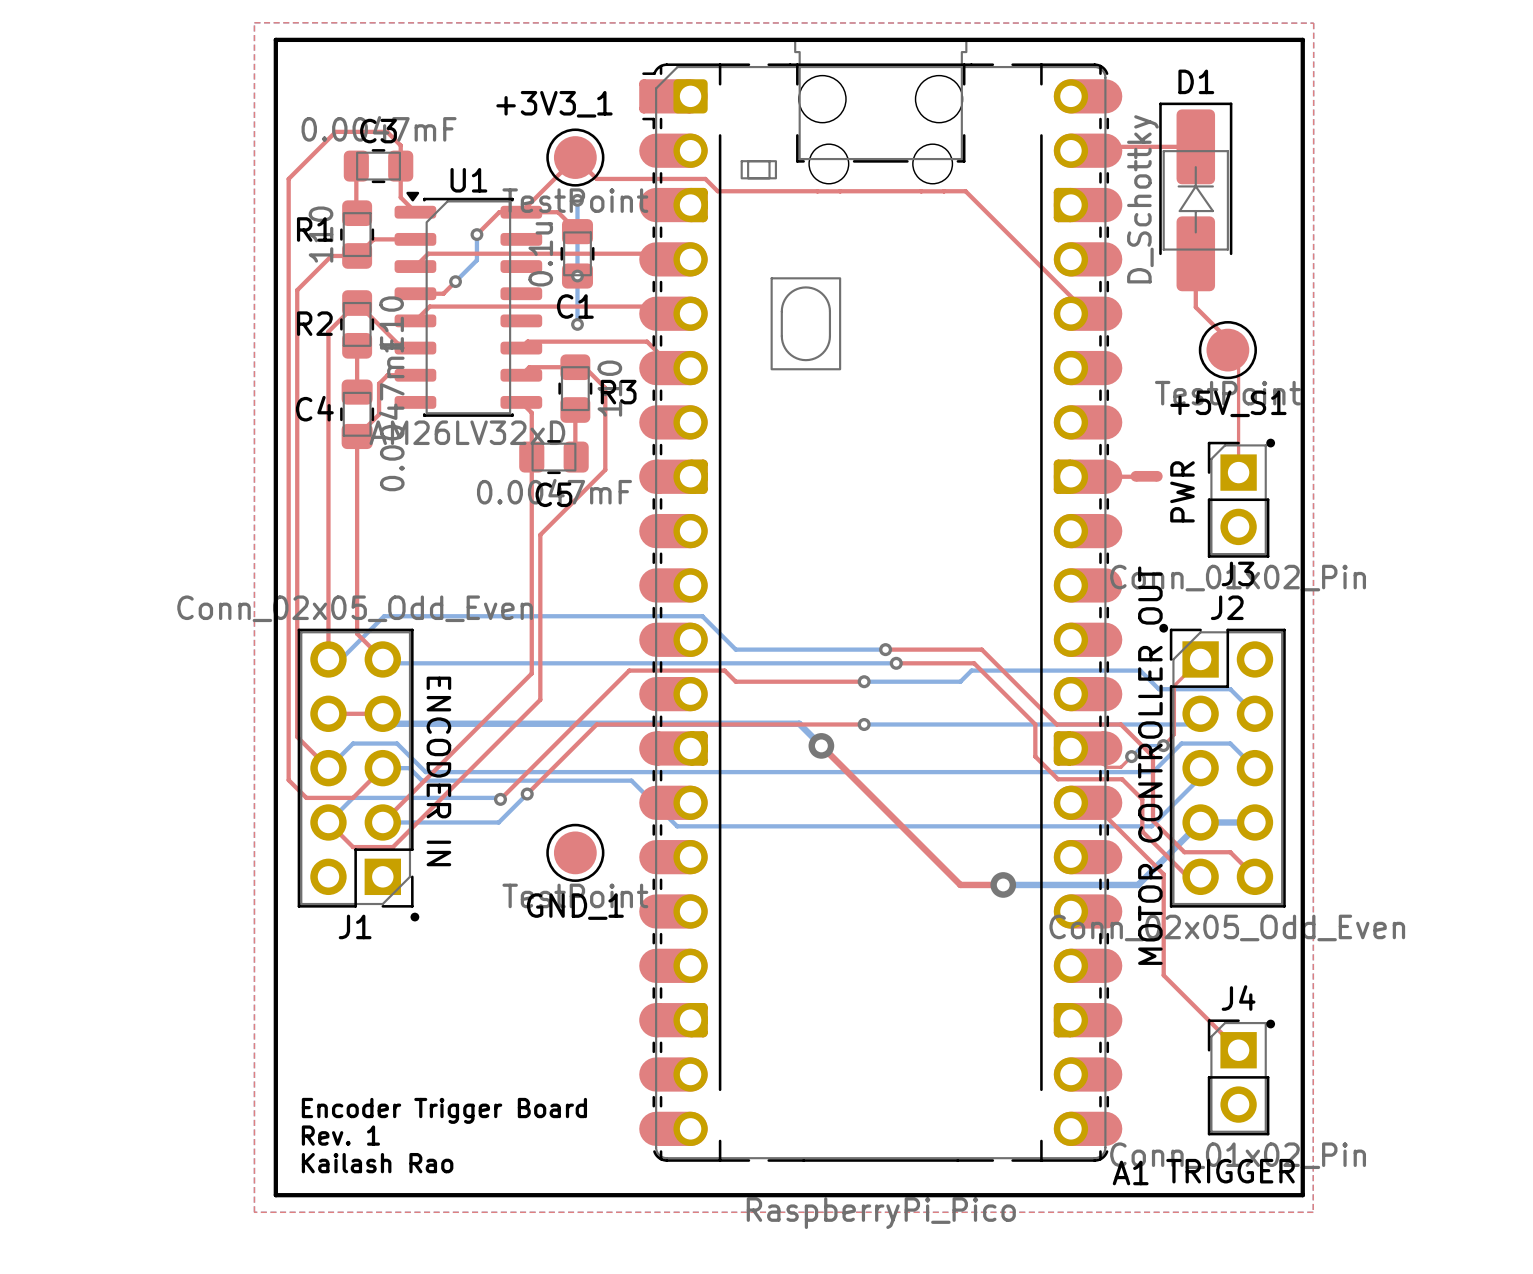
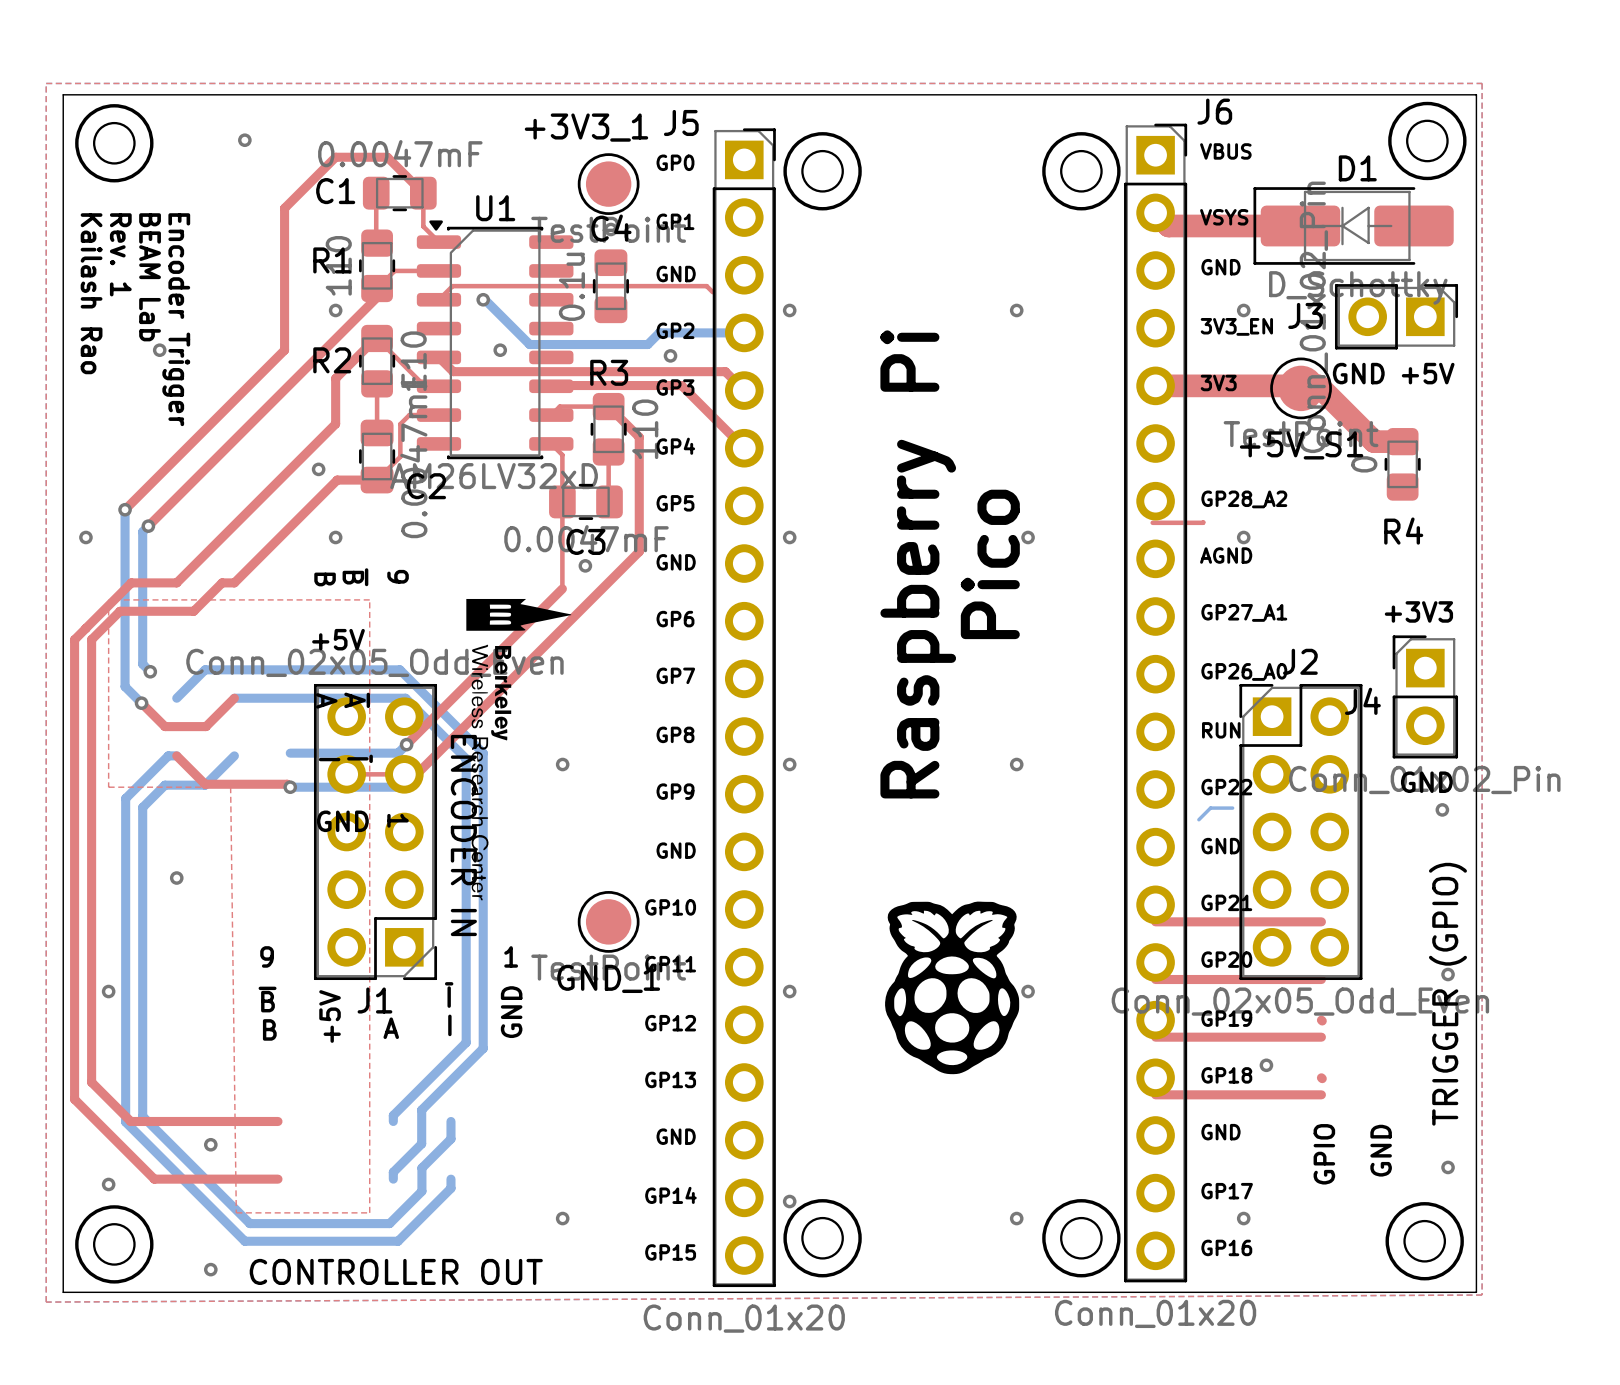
top zone outline: (254, 22) (1313, 23) (1313, 1212) (254, 1212) (254, 22) -> (46, 83) (46, 1302) (1482, 1295) (1482, 83) (46, 83)
board edge: (275, 39) (1302, 39) (1302, 1195) (275, 1195) (275, 39) -> (63, 94) (63, 1292) (1476, 1292) (1476, 94) (63, 94)
drawing: none -> [1388, 101, 1467, 181]
D1 name position: D1 (1196, 81) -> D1 (1357, 168)
drawing: none -> [75, 104, 154, 183]
round board edge: none -> [1406, 119, 1449, 163]
round board edge: none -> [93, 121, 136, 165]
drawing: none -> [783, 132, 862, 211]
drawing: none -> [1042, 132, 1121, 211]
via: none -> (244, 140)
round board edge: none -> [801, 149, 844, 193]
round board edge: none -> [1060, 149, 1103, 193]
text: none -> VBUS (1225, 151)
C3 name: C3 (378, 131) -> C1 (335, 191)
text: none -> GP0 (675, 162)
top track: (1195, 146) (1091, 146) (1088, 150) -> none
top track: (575, 157) (596, 178) (705, 178) (717, 191) (965, 191) (1088, 313) -> none
top track: (400, 166) (400, 145) (387, 131) (335, 131) (288, 178) (288, 780) (306, 797) (353, 797) (382, 768) -> (423, 193) (387, 157) (335, 157) (284, 208) (284, 350) (125, 509)
top track: (562, 170) (521, 212) (558, 212) (577, 231) -> none
top track: none -> (1155, 212) (1168, 225) (1300, 225)
text: none -> VSYS (1224, 217)
text: none -> GP1 (675, 221)
D1 rotation: 0° (1195, 196) -> 90° counterclockwise (1353, 225)
bottom track: (577, 200) (577, 324) -> none
top track: (511, 212) (499, 212) (476, 234) -> none
text: none -> Rev. 1 (120, 254)
bottom track: (476, 234) (476, 260) (455, 281) -> none
via: (476, 234) -> none
text: none -> GND (1220, 267)
text: none -> GND (676, 274)
text: none -> BEAM Lab (150, 277)
top track: (1195, 253) (1195, 307) (1227, 339) (1227, 350) (1238, 360) (1238, 472) -> none
top track: (357, 255) (331, 255) (297, 290) (297, 736) (328, 768) -> (377, 288) (377, 297) (148, 526)
text: none -> Kailash Rao (91, 293)
bottom track: none -> (484, 299) (529, 344) (647, 344) (659, 332) (744, 332) (737, 326)
via: none -> (335, 310)
via: (577, 276) -> none
via: none -> (789, 310)
via: none -> (1016, 310)
via: none -> (1243, 310)
top track: (455, 281) (443, 293) (429, 293) -> none
via position: (455, 281) -> (483, 299)
text: none -> Encoder Trigger (176, 319)
text: none -> 3V3_EN (1236, 326)
text: none -> GP2 (675, 330)
top track: (357, 303) (328, 331) (328, 659) -> (377, 338) (335, 378) (335, 423) (176, 582) (131, 582) (74, 639) (74, 1099) (154, 1179) (277, 1179)
C1 name: C1 (575, 306) -> C4 (611, 228)
top track: (673, 313) (666, 306) (429, 306) (415, 320) -> (744, 390) (725, 371) (453, 371) (438, 357)
via: none -> (159, 350)
via: none -> (500, 350)
via: none -> (670, 355)
via: (577, 324) -> none
text: none -> GND (1358, 373)
text: none -> +5V (1428, 373)
text: none -> 3V3 (1218, 383)
top track: (522, 347) (527, 341) (647, 341) (673, 368) -> none
top track: none -> (1155, 385) (1318, 385) (1374, 441) (1402, 441)
top track: none -> (551, 386) (681, 385) (744, 448)
text: none -> GP3 (675, 387)
top track: (584, 367) (605, 387) (605, 469) (540, 534) (540, 699) (393, 847) (353, 847) (328, 822) -> none
top track: none -> (608, 408) (608, 406) (639, 437) (639, 551) (417, 773)
R3 name position: R3 (618, 392) -> R3 (609, 372)
text: none -> GP4 (675, 446)
C4 name: C4 (314, 408) -> C2 (426, 486)
R4: none -> 0 (1402, 464)
via: none -> (318, 469)
top track: none -> (377, 480) (337, 480) (234, 582) (222, 582) (193, 611) (119, 611) (91, 639) (91, 1082) (130, 1121) (277, 1121)
drawing: [1266, 438, 1276, 448] -> none
top track: (361, 440) (357, 436) (357, 633) (382, 659) -> none
text: none -> GP28_A2 (1244, 499)
text: none -> GP5 (675, 503)
bottom track: none -> (125, 509) (125, 686) (141, 703)
via: none -> (125, 509)
part: (1146, 476) -> none
bottom track: none -> (148, 526) (142, 531) (142, 664) (150, 671)
via: none -> (148, 526)
via: none -> (85, 537)
via: none -> (335, 537)
via: none -> (789, 537)
via: none -> (1028, 537)
via: none -> (1243, 537)
text: PWR (1182, 491) -> none
C5 name: C5 (553, 494) -> C3 (585, 541)
J3 rotation: 0° (1238, 499) -> 90° clockwise (1396, 316)
J3 position: (1238, 499) -> (1396, 316)
text: none -> AGND (1226, 555)
text: none -> GND (676, 562)
text: none -> Raspberry Pi (918, 564)
text: none -> Pico (990, 564)
via: none -> (585, 565)
text: none -> 9 (398, 576)
text: none -> ~{B} (355, 577)
text: none -> B (325, 579)
top track: (531, 539) (531, 673) (382, 822) -> (562, 588) (406, 744)
drawing: none -> [466, 598, 572, 901]
top zone outline: none -> (108, 599) (369, 599) (369, 1212) (236, 1212) (230, 787) (108, 787) (108, 599)
text: none -> +3V3 (1418, 611)
text: none -> GP27_A1 (1244, 612)
text: none -> GP6 (675, 619)
text: none -> +5V (338, 639)
A1: RaspberryPi_Pico (880, 599) -> none
via: none -> (150, 671)
text: none -> GP26_A0 (1244, 671)
text: none -> GP7 (675, 675)
drawing: [1159, 623, 1169, 633] -> none
bottom track: none -> (176, 698) (205, 669) (399, 669) (483, 753) (483, 1048) (421, 1110) (421, 1143) (393, 1172) (393, 1179)
top track: none -> (234, 698) (206, 726) (164, 726) (141, 703)
bottom track: none -> (234, 698) (405, 698) (466, 758) (466, 1042) (393, 1115) (393, 1121)
text: none -> A (326, 700)
text: none -> ~{A} (357, 700)
via: none -> (141, 703)
J6: none -> Conn_01x20 (1155, 703)
top track: (885, 649) (981, 649) (1056, 724) (1120, 724) (1153, 756) (1153, 820) (1184, 852) (1230, 852) (1254, 876) -> none
bottom track: (885, 649) (735, 649) (702, 616) (384, 616) (340, 659) (328, 659) -> none
via: (885, 649) -> none
J5: none -> Conn_01x20 (744, 707)
top track: (1200, 659) (1174, 685) (1174, 734) (1163, 745) -> none
bottom track: (386, 663) (896, 663) -> none
top track: (896, 663) (974, 663) (1035, 724) (1035, 756) (1058, 779) (1122, 779) (1142, 799) (1142, 831) (1187, 876) (1200, 876) -> none
via: (896, 663) -> none
text: none -> RUN (1221, 730)
text: none -> GP8 (675, 734)
top track: (864, 681) (735, 681) (724, 670) (629, 670) (500, 799) -> none
bottom track: (864, 681) (960, 681) (971, 670) (1140, 670) (1158, 689) (1230, 689) (1254, 713) -> none
via: (864, 681) -> none
bottom track: none -> (406, 744) (398, 753) (290, 753)
via: none -> (406, 744)
top track: none -> (176, 755) (205, 784) (287, 784) (290, 787)
bottom track: none -> (176, 755) (168, 755) (125, 798) (125, 1122) (244, 1241) (398, 1241) (450, 1188) (450, 1179)
bottom track: none -> (234, 755) (205, 785) (164, 785) (142, 807) (142, 1116) (249, 1223) (389, 1223) (421, 1191) (421, 1168) (450, 1139) (450, 1121)
text: none -> I (329, 759)
text: none -> ~{I} (359, 758)
via: none -> (562, 764)
via: none -> (789, 764)
via: none -> (1016, 764)
bottom track: none -> (417, 773) (403, 787) (290, 787)
bottom track: (382, 713) (393, 724) (799, 723) (821, 745) -> none
bottom track: (1200, 713) (1189, 724) (864, 724) -> none
text: none -> GND (1426, 782)
top track: (864, 724) (596, 724) (527, 794) -> none
via: (864, 724) -> none
via: none -> (290, 787)
text: none -> GP22 (1226, 787)
text: none -> GP9 (675, 791)
top track: (821, 745) (960, 884) (1003, 884) -> none
via: (821, 745) -> none
via: (1163, 745) -> none
via: none -> (1442, 809)
top track: (1088, 748) (1106, 767) (1120, 767) (1131, 756) -> none
via: (1131, 756) -> none
text: none -> 1 (398, 820)
text: none -> GND (342, 821)
text: MOTOR CONTROLLER OUT (1150, 765) -> none
bottom track: (328, 768) (353, 743) (397, 743) (425, 772) (1153, 772) (1181, 743) (1230, 743) (1254, 768) -> none
bottom track: (382, 768) (409, 768) (422, 780) (631, 780) (677, 826) (1151, 826) (1203, 775) -> none
text: none -> GND (1220, 846)
text: none -> GND (676, 850)
bottom track: (527, 794) (498, 822) (382, 822) -> none
via: (527, 794) -> none
bottom track: (500, 799) (353, 797) (328, 822) -> none
via: (500, 799) -> none
top track: (1088, 802) (1092, 802) (1163, 874) (1163, 975) (1238, 1050) -> none
via: none -> (176, 878)
bottom track: (1254, 822) (1200, 822) (1138, 884) (1003, 884) -> none
drawing: none -> [885, 901, 1020, 1075]
text: none -> GP21 (1226, 902)
text: none -> GP10 (670, 907)
top track: none -> (1155, 921) (1321, 921)
via: (1003, 884) -> none
text: none -> 9 (267, 956)
text: none -> 1 (511, 956)
text: none -> GP20 (1226, 959)
text: none -> GP11 (670, 964)
via: none -> (1448, 974)
top track: none -> (1155, 979) (1321, 979)
drawing: [410, 912, 420, 922] -> none
via: none -> (108, 991)
via: none -> (789, 991)
via: none -> (1028, 991)
text: none -> ~{I} (449, 994)
text: none -> TRIGGER (GPIO) (1447, 994)
text: none -> ~{B} (267, 999)
text: none -> GND (511, 1012)
text: none -> +5V (330, 1016)
text: none -> GP19 (1226, 1018)
top track: none -> (1321, 1020) (1322, 1020)
text: none -> GP12 (670, 1023)
text: none -> I (449, 1025)
text: none -> A (391, 1028)
text: none -> B (269, 1029)
top track: none -> (1155, 1037) (1321, 1037)
via: none -> (1266, 1065)
text: none -> GP18 (1226, 1075)
J4 name position: J4 (1238, 998) -> J4 (1362, 701)
top track: none -> (1321, 1077) (1322, 1078)
text: none -> GP13 (670, 1079)
top track: none -> (1155, 1094) (1321, 1094)
drawing: [1266, 1019, 1276, 1029] -> none
text: none -> GND (1220, 1132)
text: none -> GND (676, 1136)
via: none -> (210, 1144)
text: none -> GND (1381, 1150)
text: none -> GPIO (1324, 1154)
J4 position: (1238, 1077) -> (1425, 696)
via: none -> (1448, 1167)
via: none -> (108, 1184)
text: none -> GP17 (1227, 1191)
text: Encoder Trigger Board (444, 1110) -> none
text: none -> GP14 (670, 1195)
drawing: none -> [783, 1199, 862, 1278]
drawing: none -> [1042, 1199, 1121, 1278]
via: none -> (789, 1201)
drawing: none -> [1385, 1202, 1464, 1281]
drawing: none -> [75, 1205, 154, 1284]
round board edge: none -> [801, 1216, 844, 1260]
round board edge: none -> [1060, 1216, 1103, 1260]
via: none -> (562, 1218)
via: none -> (1016, 1218)
via: none -> (1243, 1218)
round board edge: none -> [1403, 1219, 1447, 1263]
text: Rev. 1 (340, 1135) -> none
round board edge: none -> [93, 1223, 136, 1266]
text: none -> GP16 (1226, 1247)
text: Kailash Rao (377, 1163) -> none
text: none -> GP15 (670, 1252)
text: TRIGGER (1230, 1171) -> none
via: none -> (210, 1269)
text: none -> CONTROLLER OUT (396, 1271)

